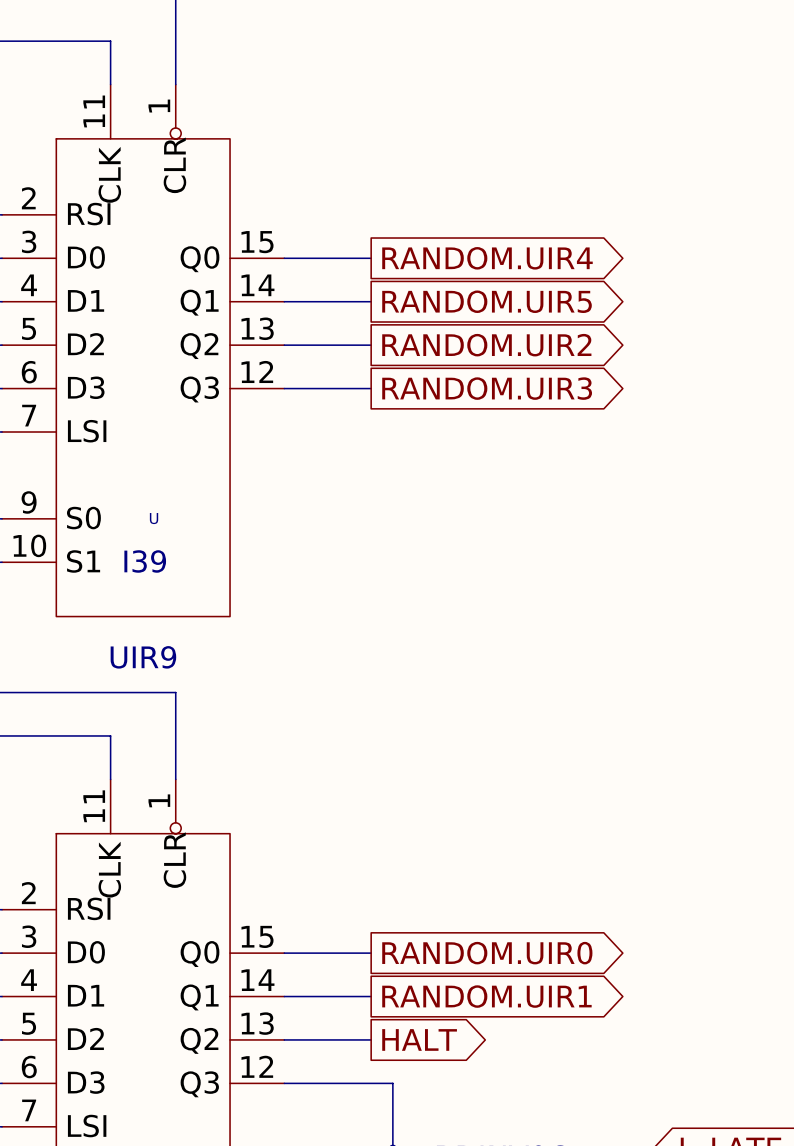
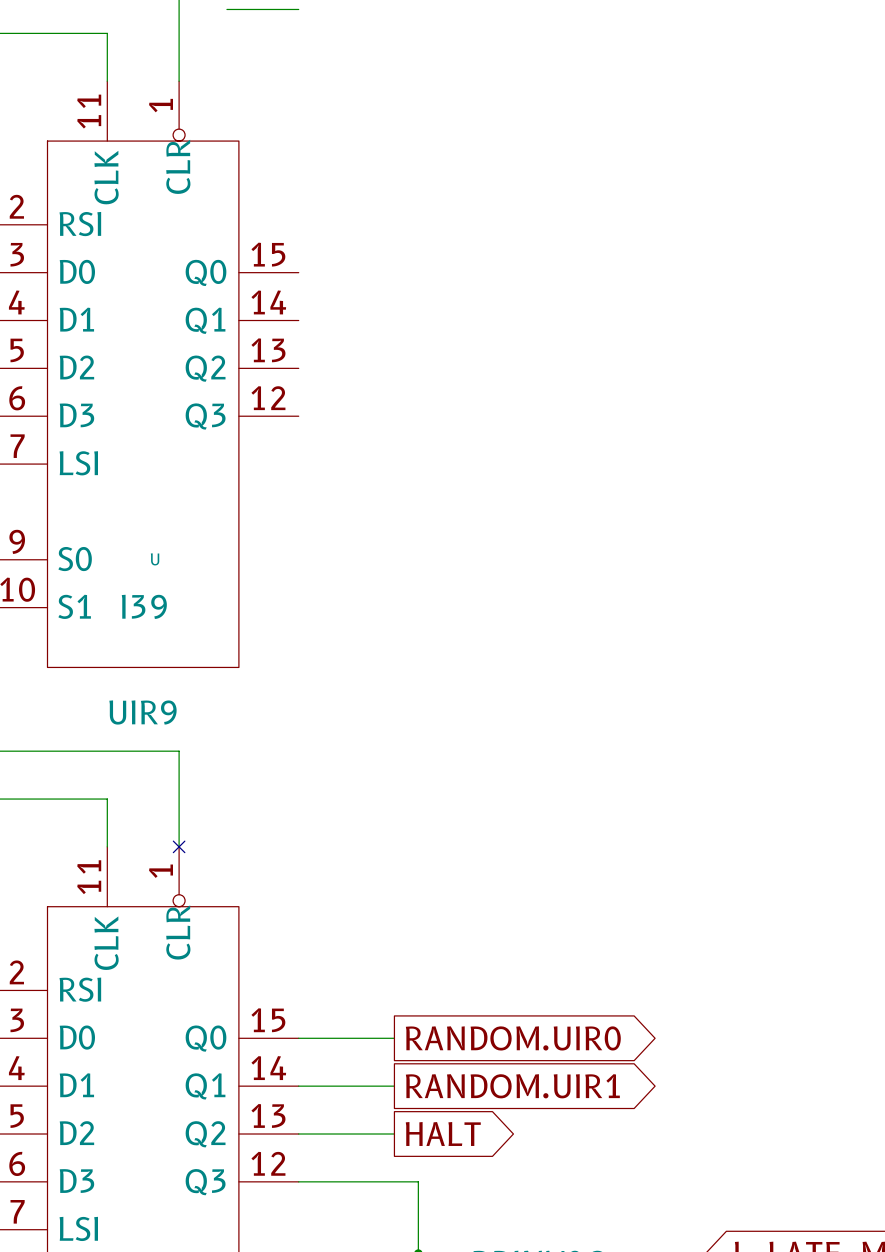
wire: none -> (226, 9) (298, 9)
wire: (284, 258) (371, 258) -> none
global label: RANDOM.UIR4 (487, 258) -> none
wire: (284, 301) (371, 301) -> none
global label: RANDOM.UIR5 (487, 301) -> none
wire: (284, 345) (371, 345) -> none
global label: RANDOM.UIR2 (486, 345) -> none
wire: (284, 388) (371, 388) -> none
global label: RANDOM.UIR3 (487, 388) -> none
no-connect mark: none -> (179, 846)

